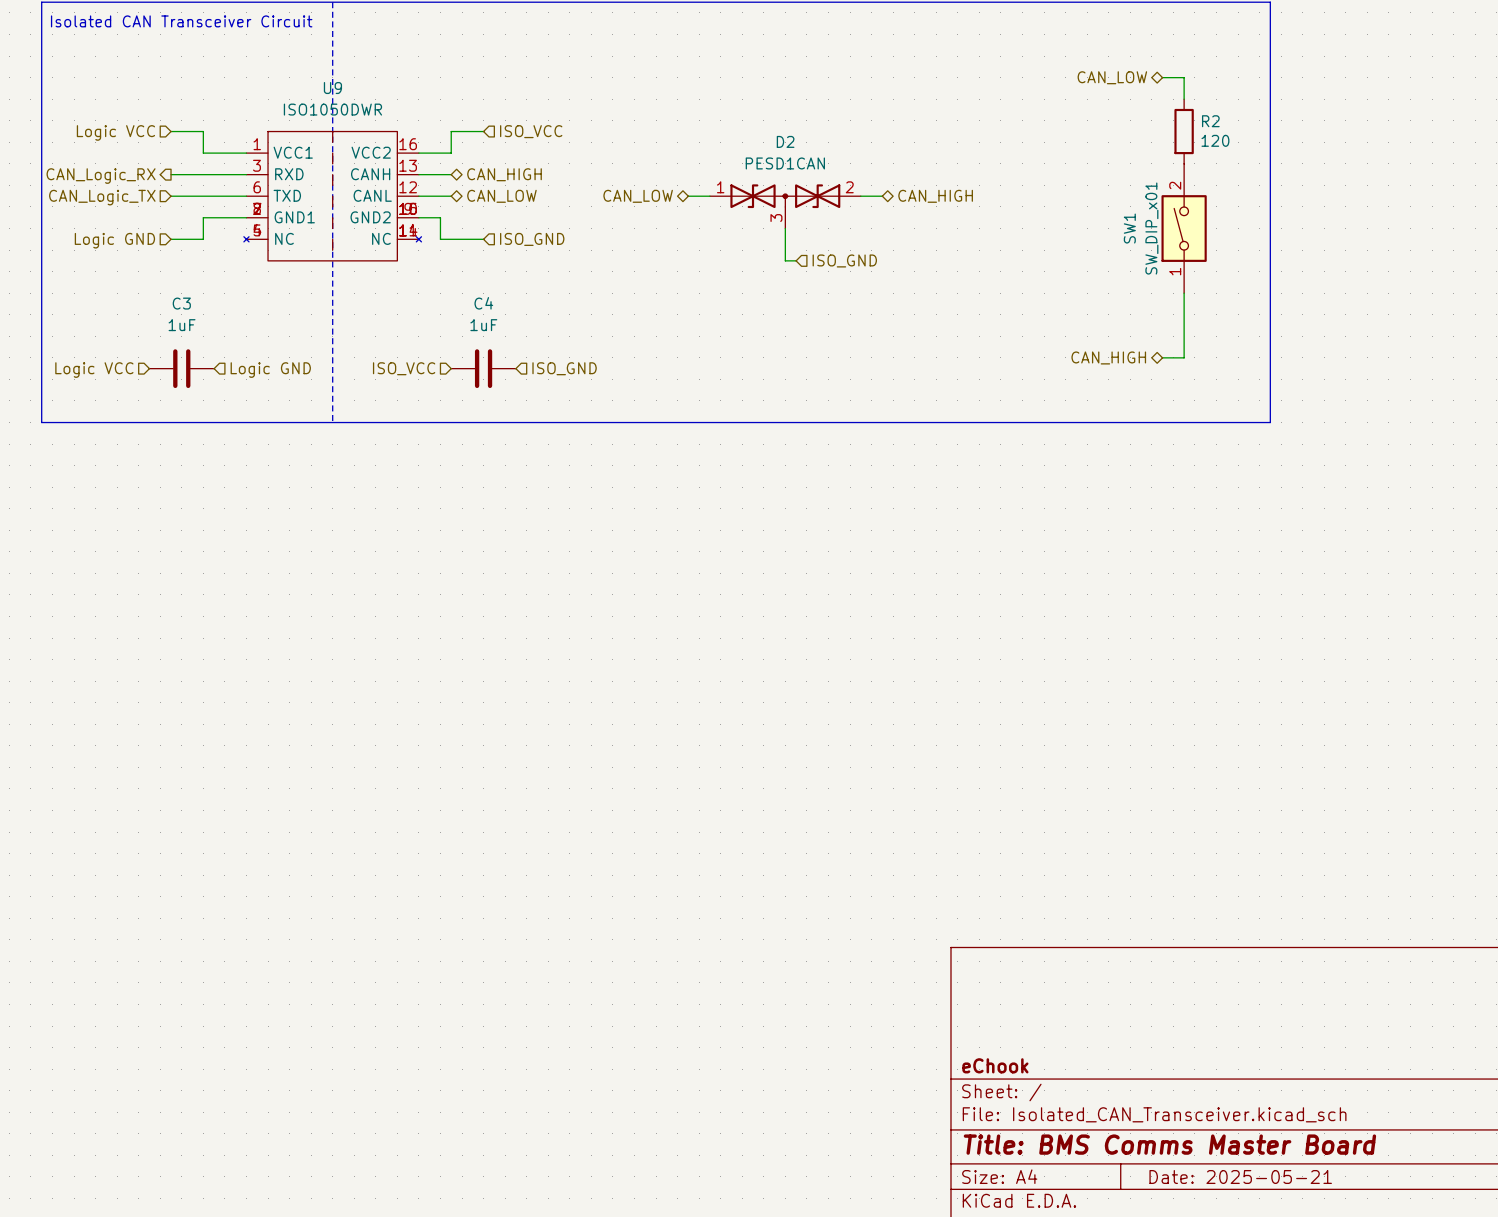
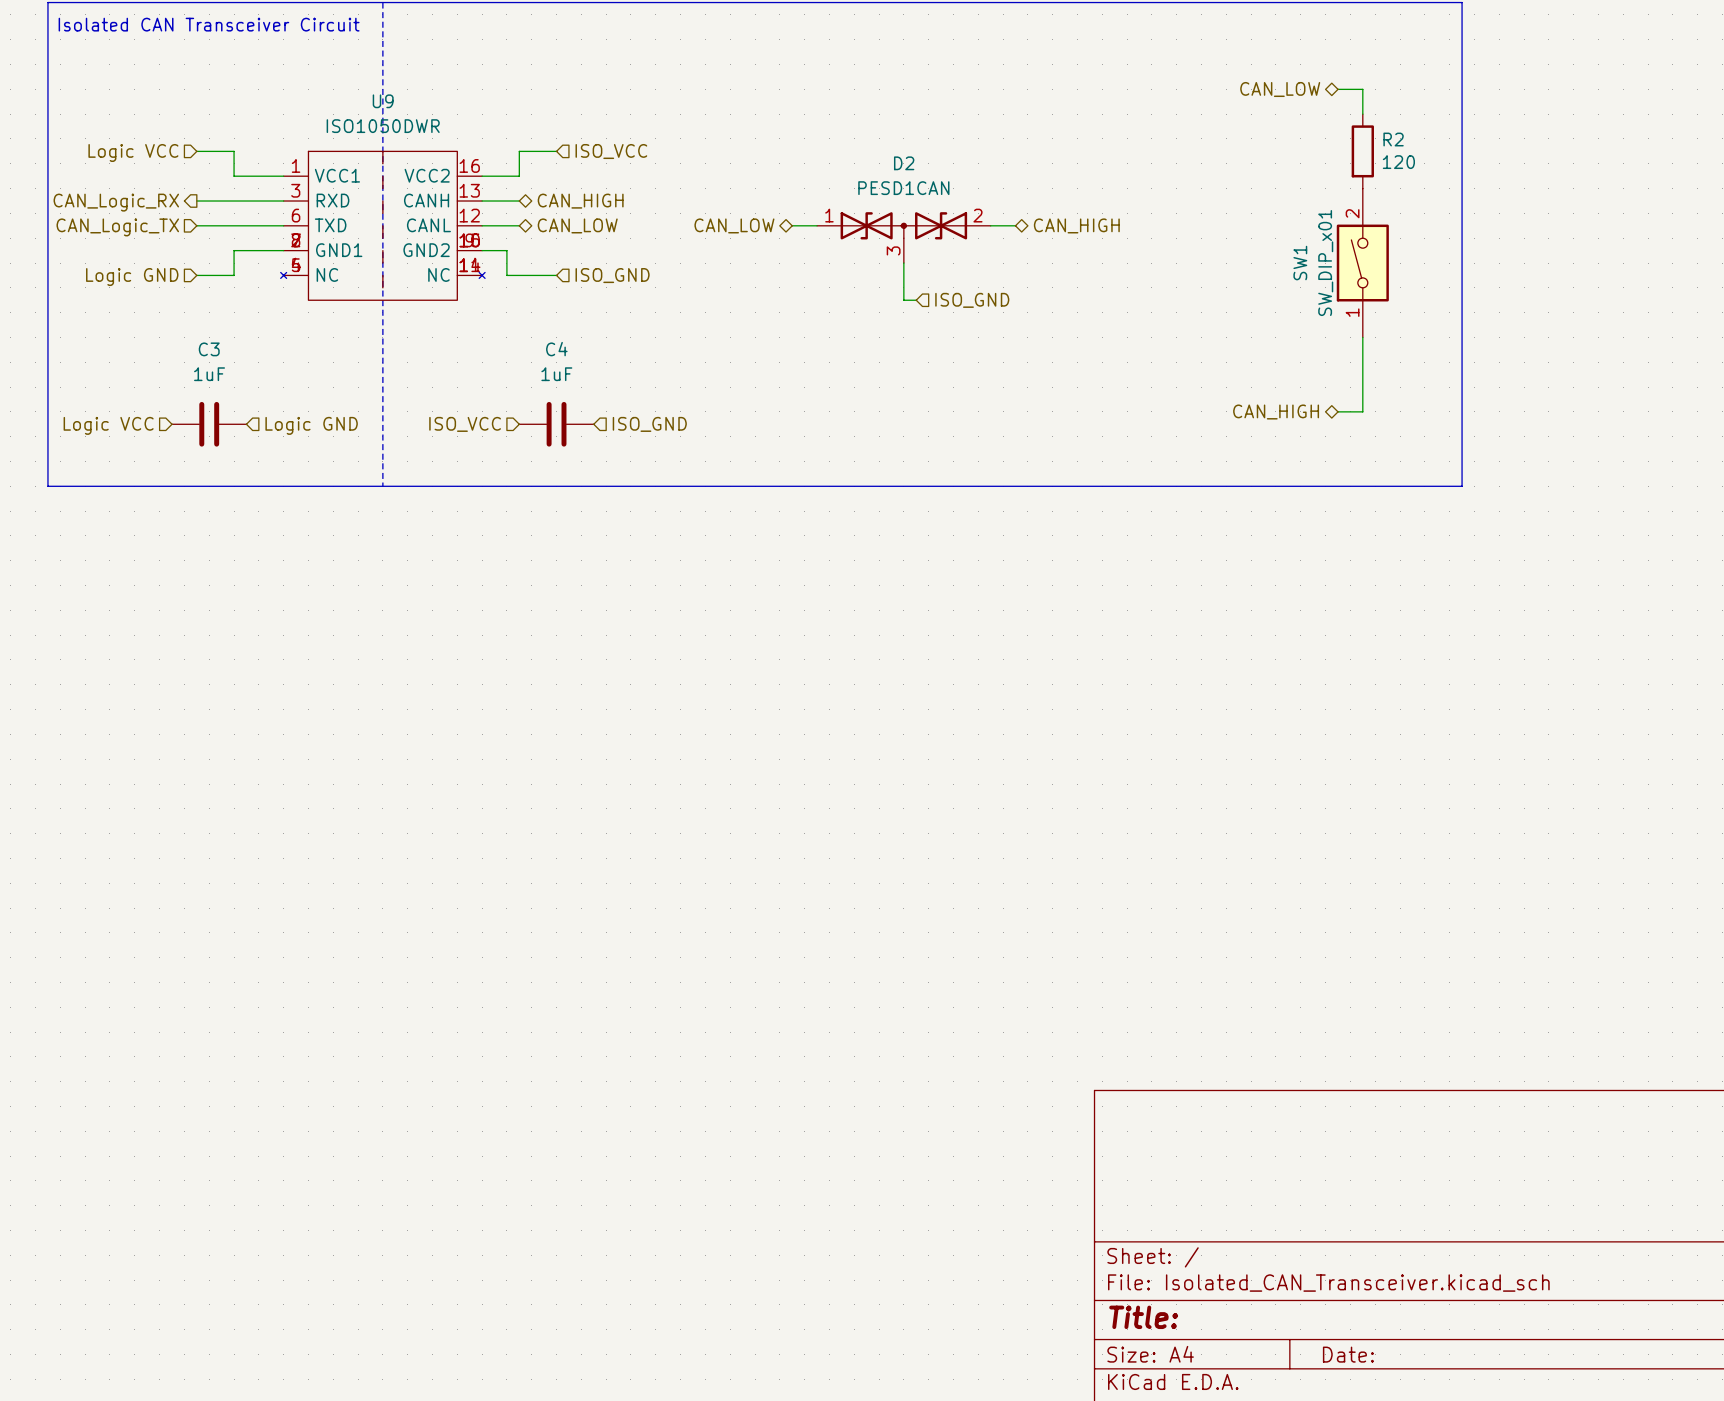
title block: eChook (995, 1065) -> none
title block: Title: BMS Comms Master Board (1169, 1144) -> Title: (1143, 1317)
title block: Date: 2025-05-21 (1240, 1177) -> Date: (1348, 1354)

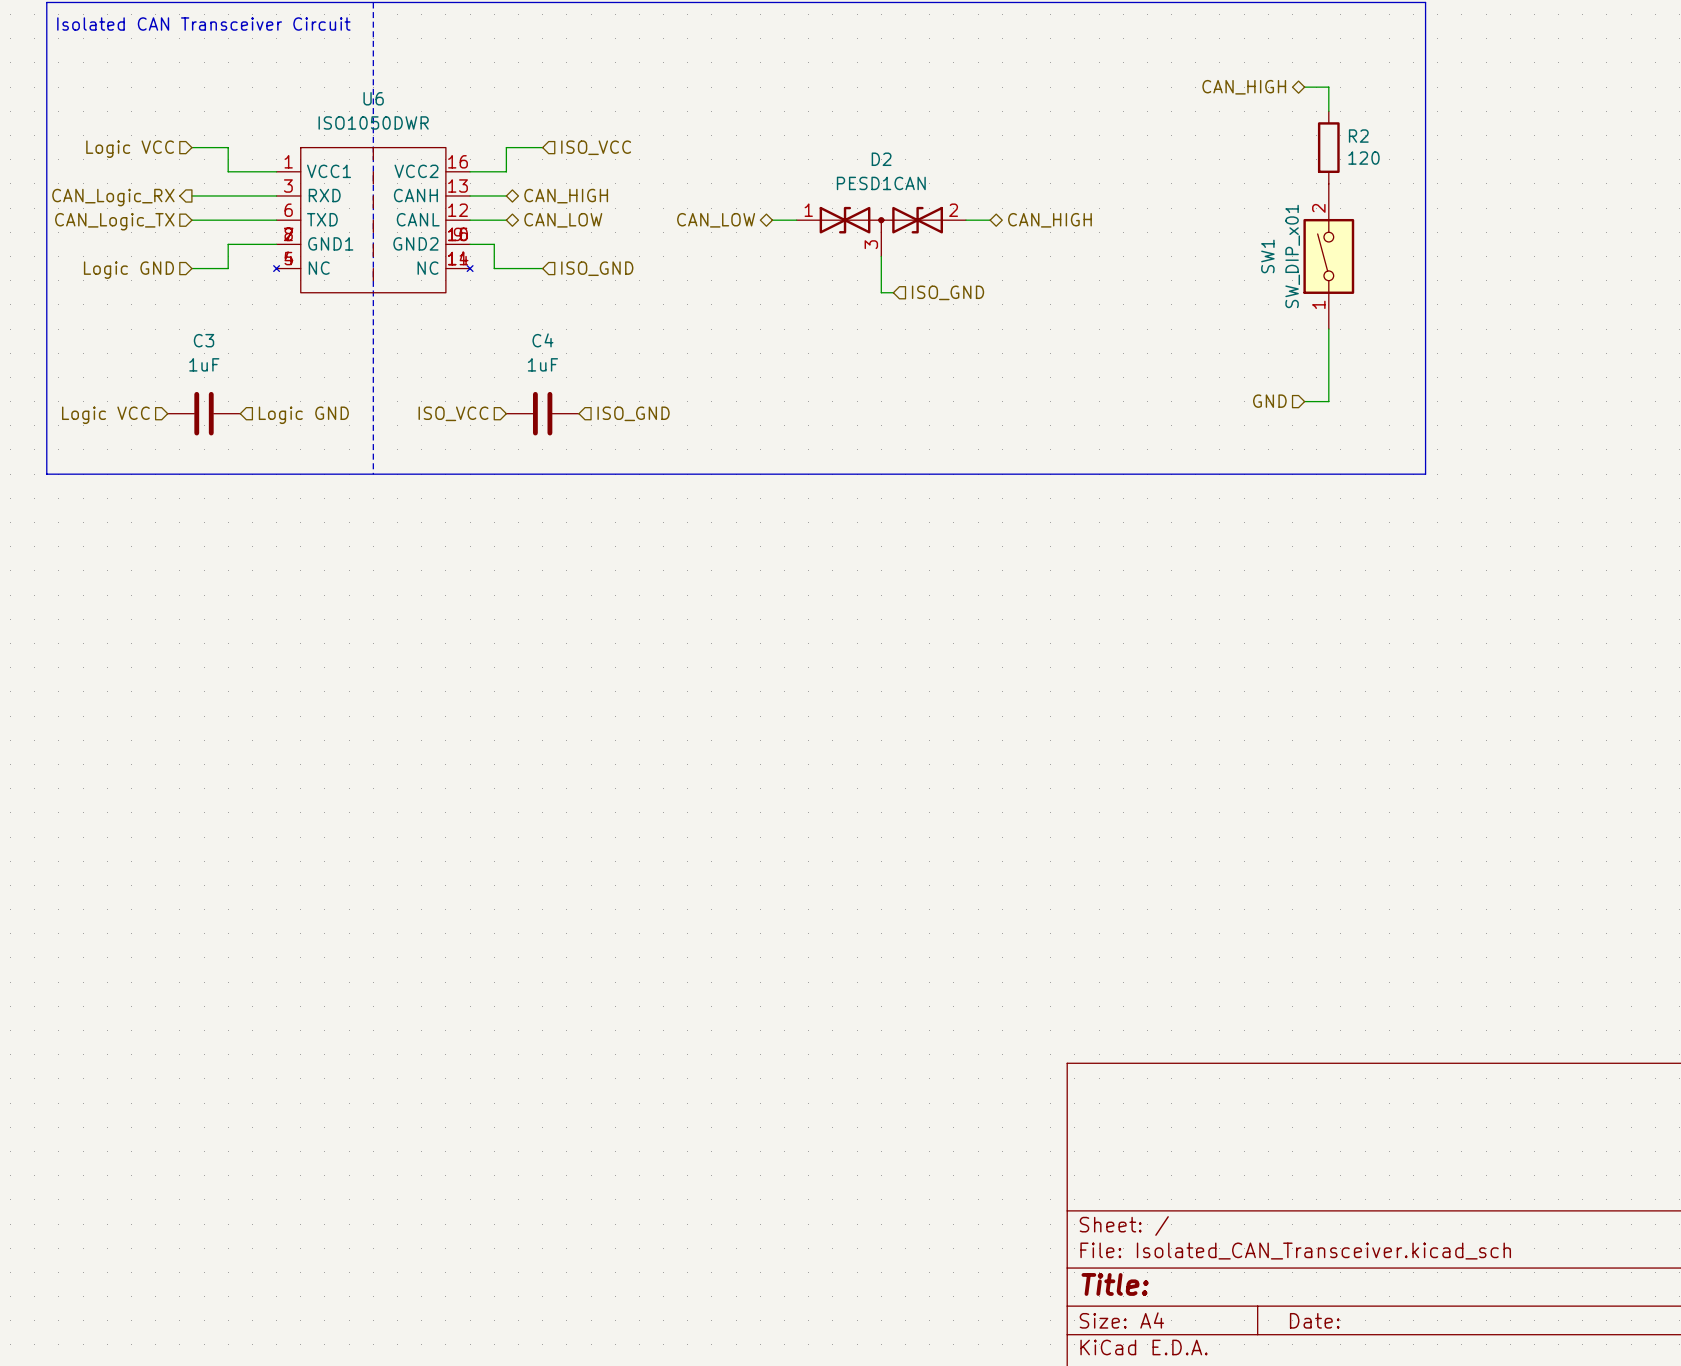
hierarchical label: CAN_LOW (1280, 89) -> CAN_HIGH (1244, 87)
U9 name: U9 (383, 101) -> U6 (373, 98)
hierarchical label shape: bidirectional (1276, 412) -> input (1269, 401)
hierarchical label: CAN_HIGH (1276, 412) -> GND (1269, 401)

